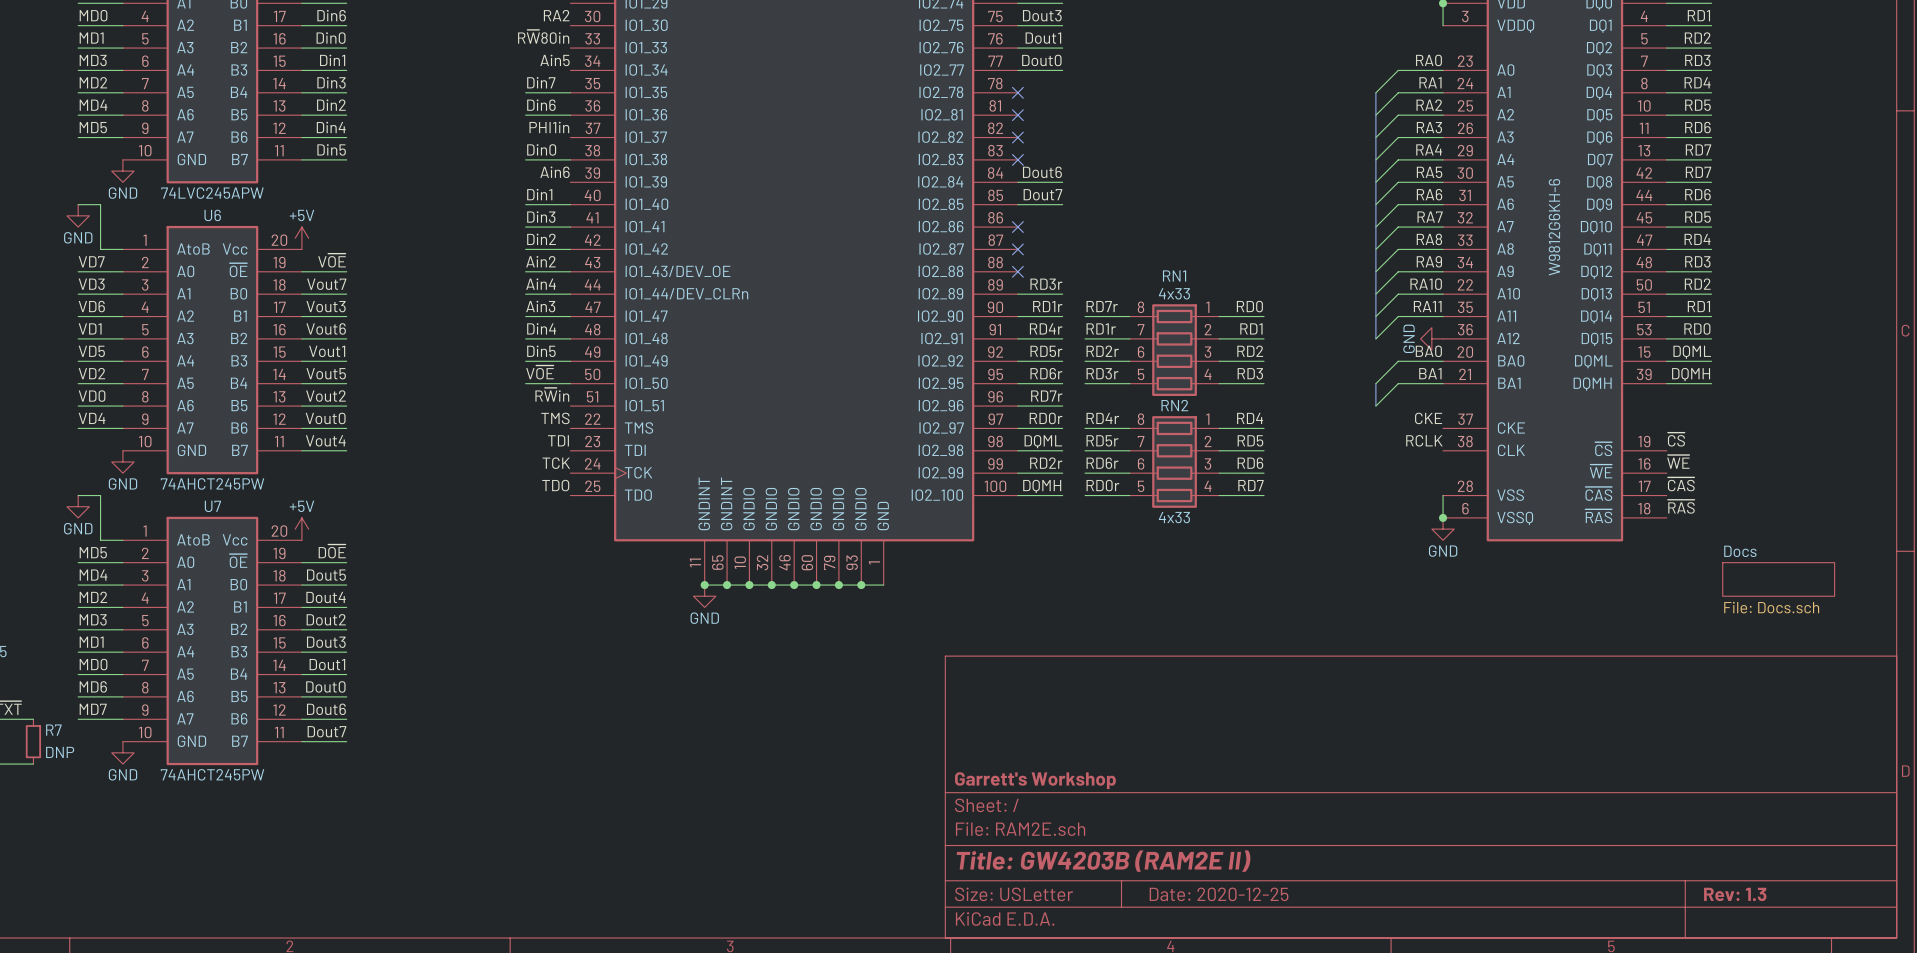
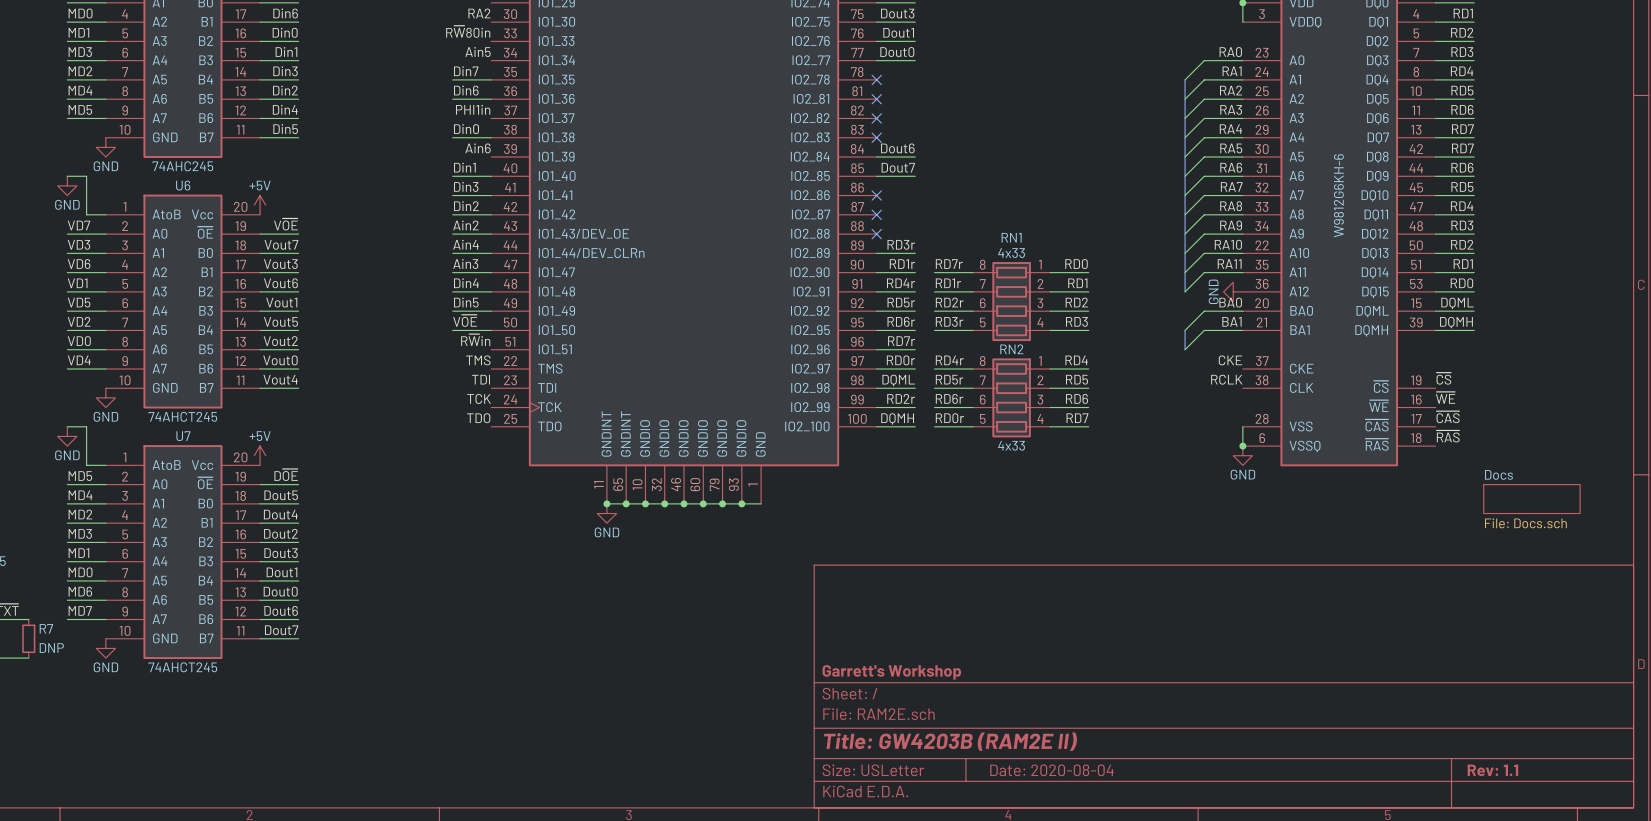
part value: 74LVC245APW (212, 193) -> 74AHC245 (182, 166)
U6 value: 74AHCT245PW (212, 483) -> 74AHCT245 (182, 416)
U7 value: 74AHCT245PW (212, 774) -> 74AHCT245 (182, 667)
title block: Date: 2020-12-25 (1219, 894) -> Date: 2020-08-04 (1052, 770)
title block: Rev: 1.3 (1735, 894) -> Rev: 1.1 (1492, 770)

